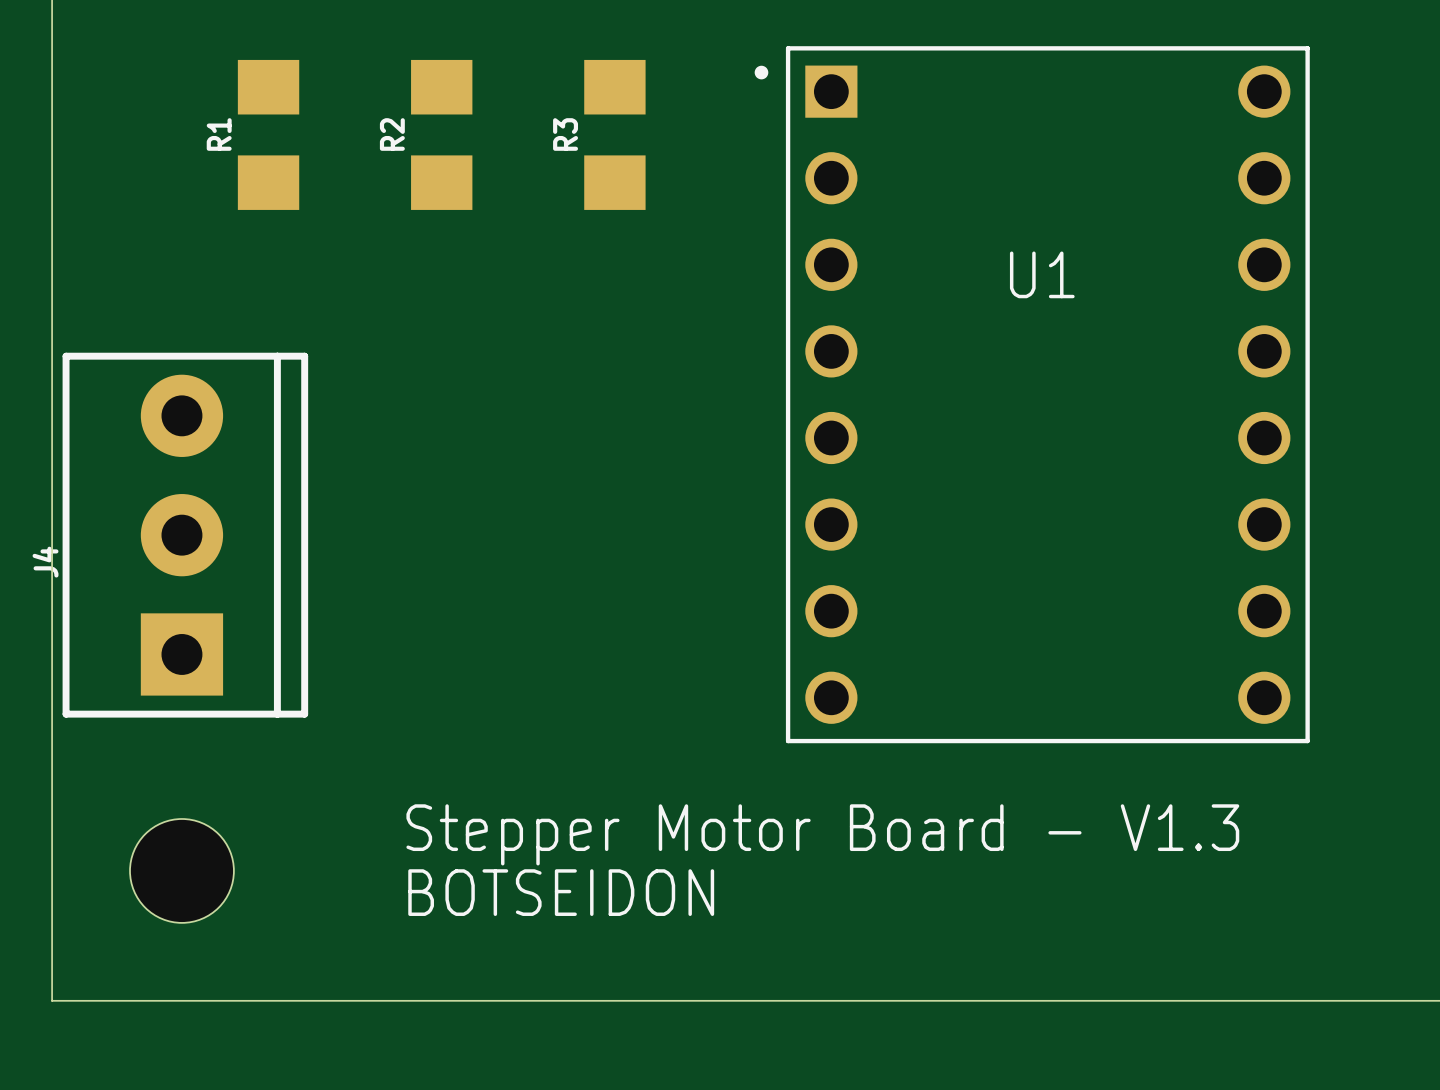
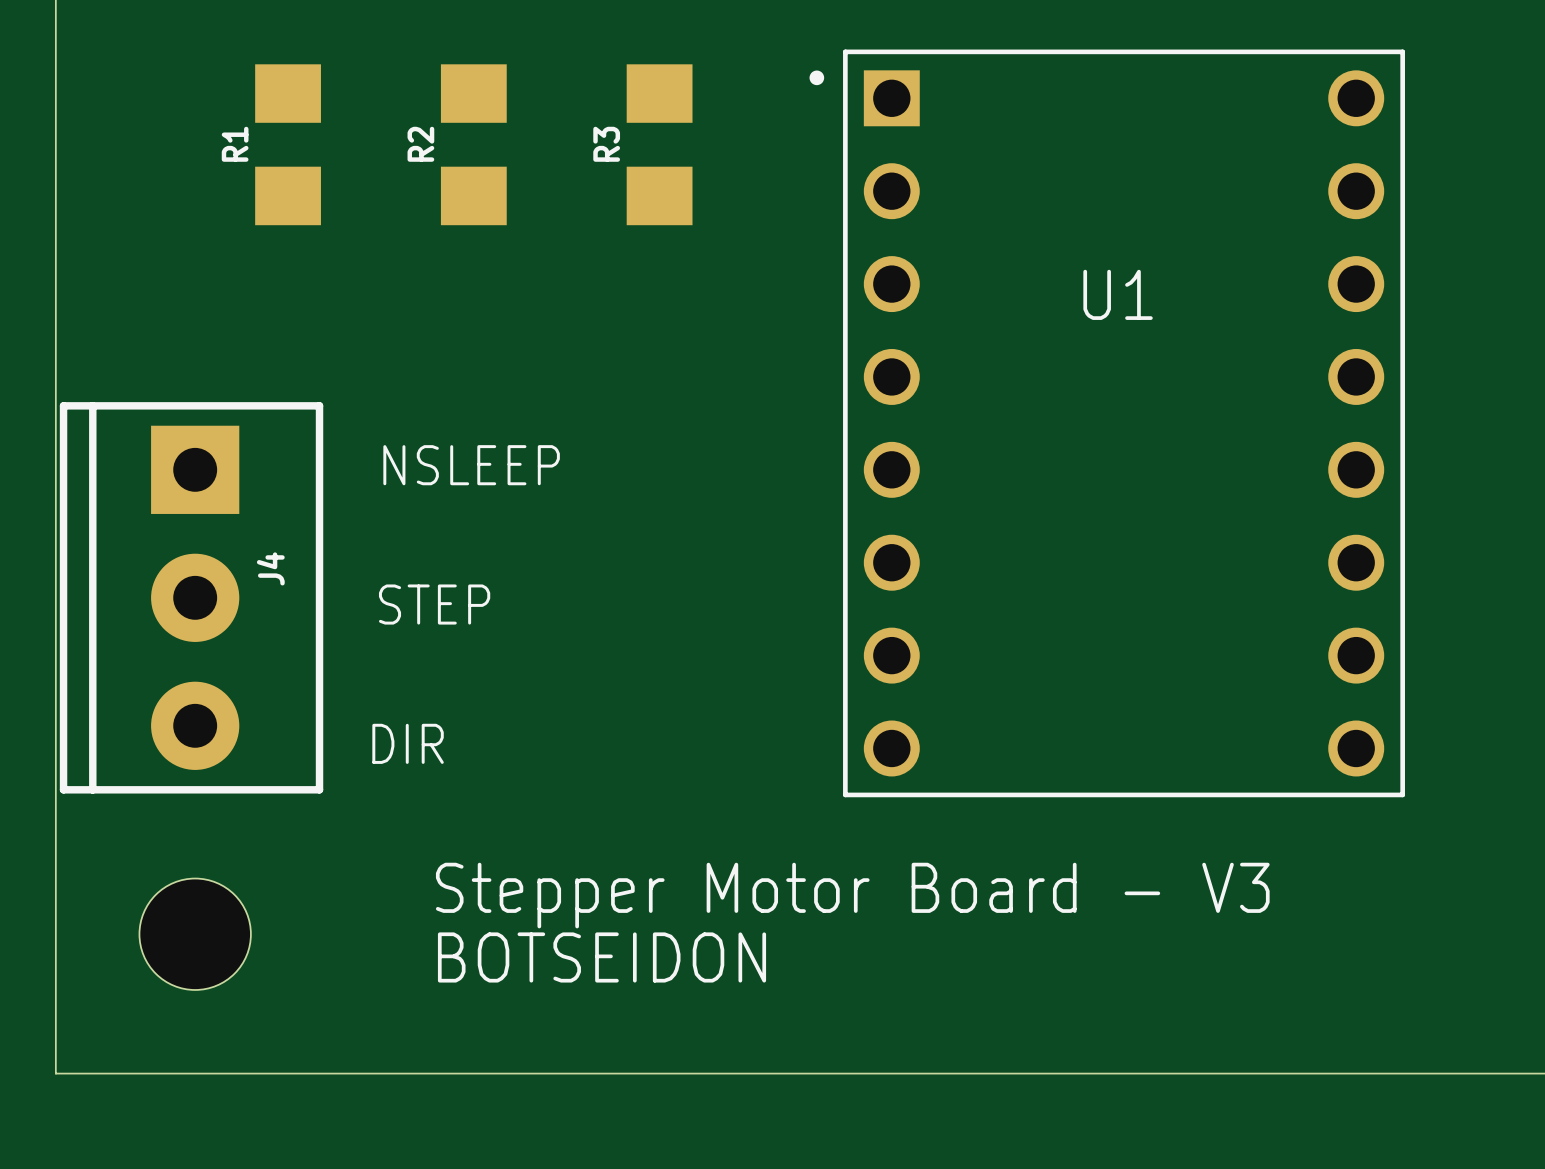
text: none -> NSLEEP (471, 465)
J4 rotation: 0° (185, 535) -> 180° (191, 597)
text: none -> STEP (434, 604)
text: none -> DIR (408, 743)
text: Stepper Motor Board - V1.3 (822, 834) -> Stepper Motor Board - V3 (852, 895)

